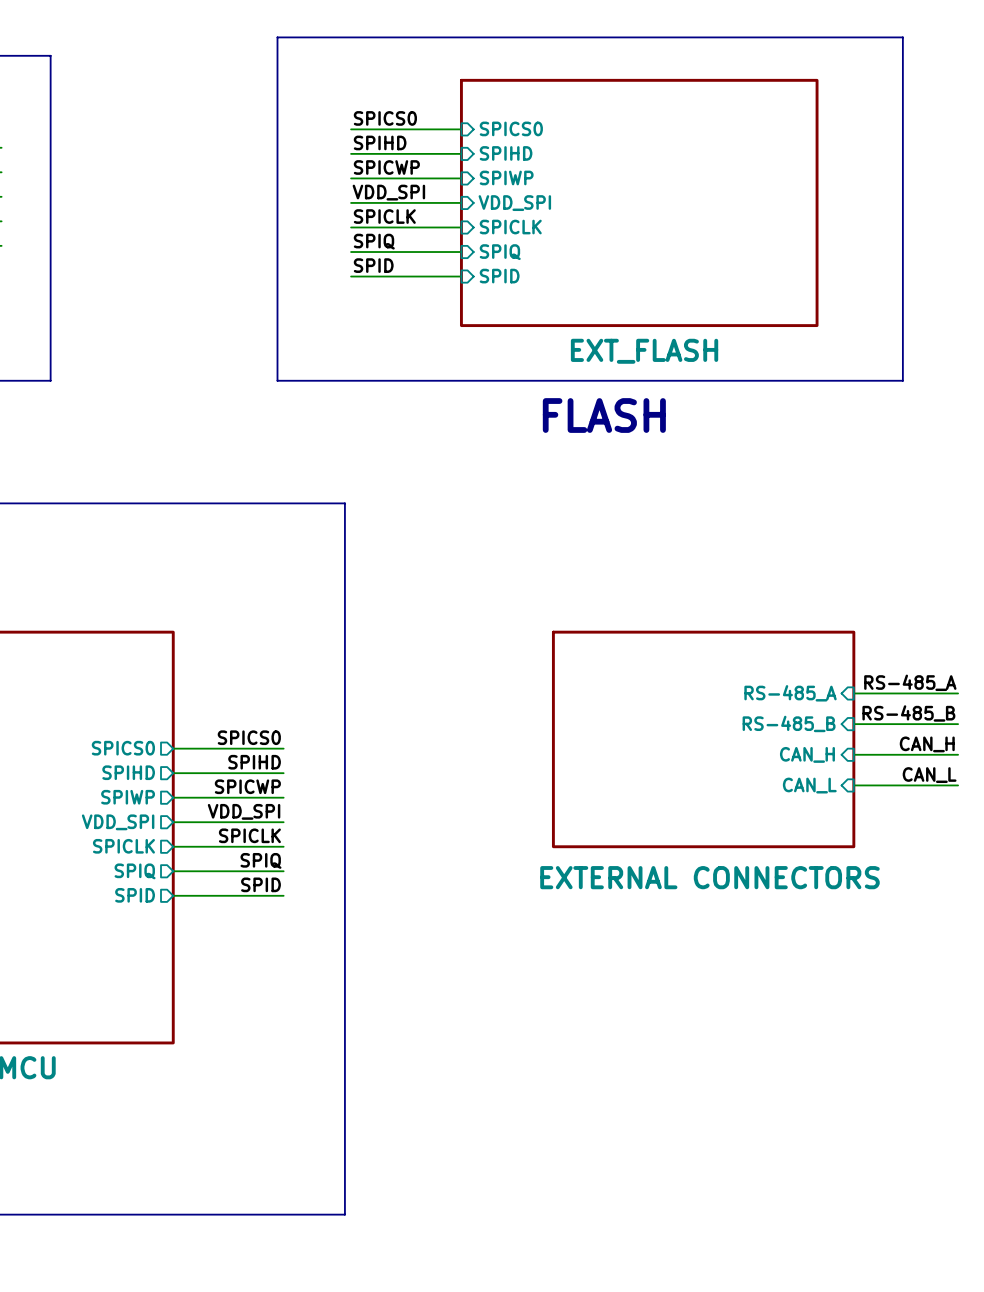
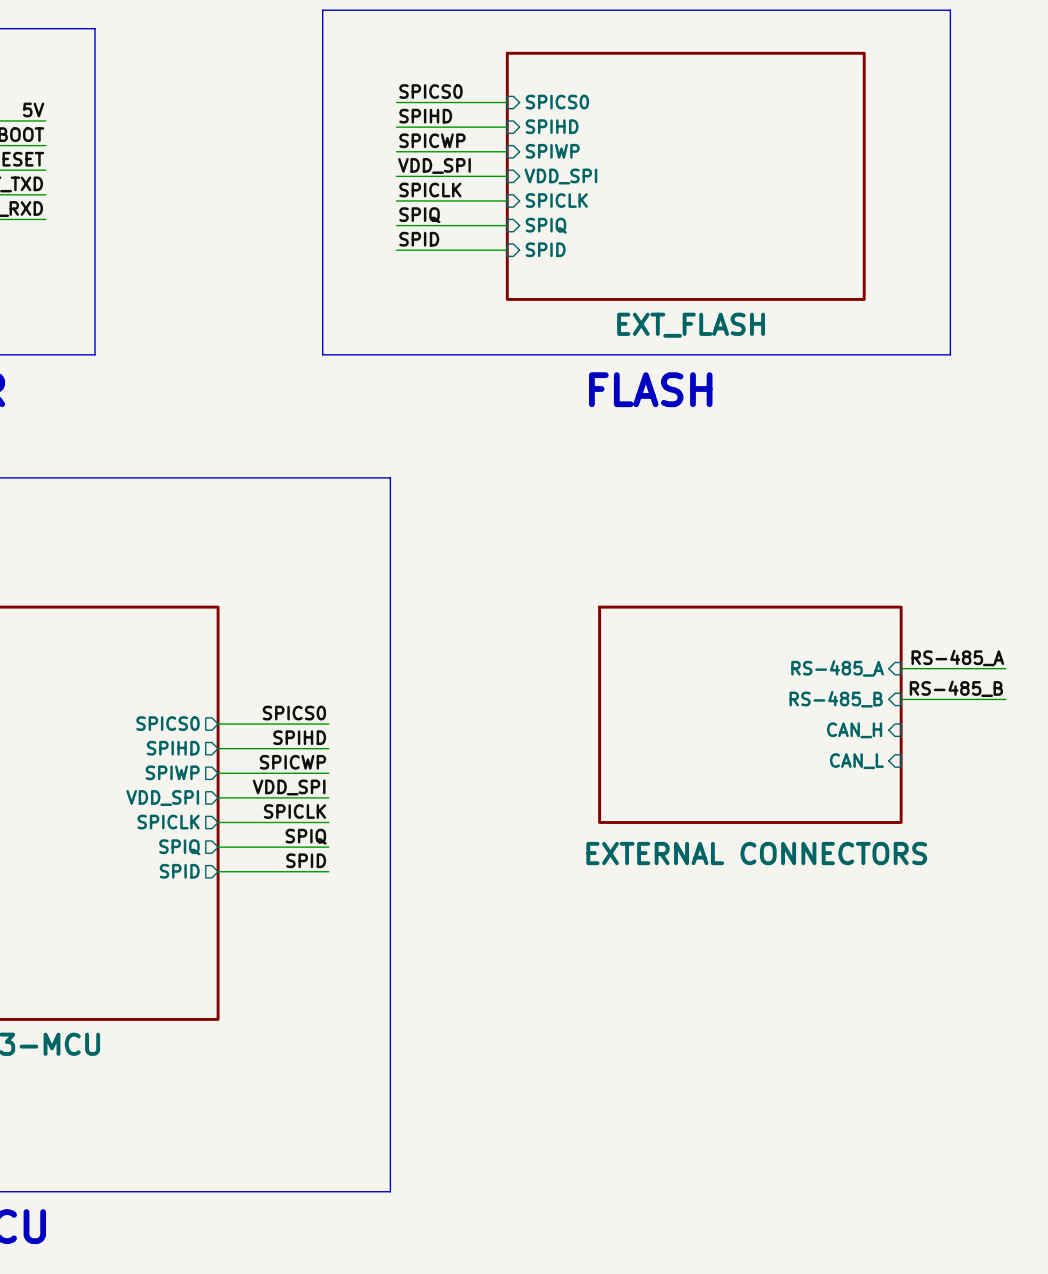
label: CAN_H (927, 744) -> none
wire: (853, 754) (958, 754) -> none
label: CAN_L (929, 775) -> none
wire: (853, 785) (958, 785) -> none

